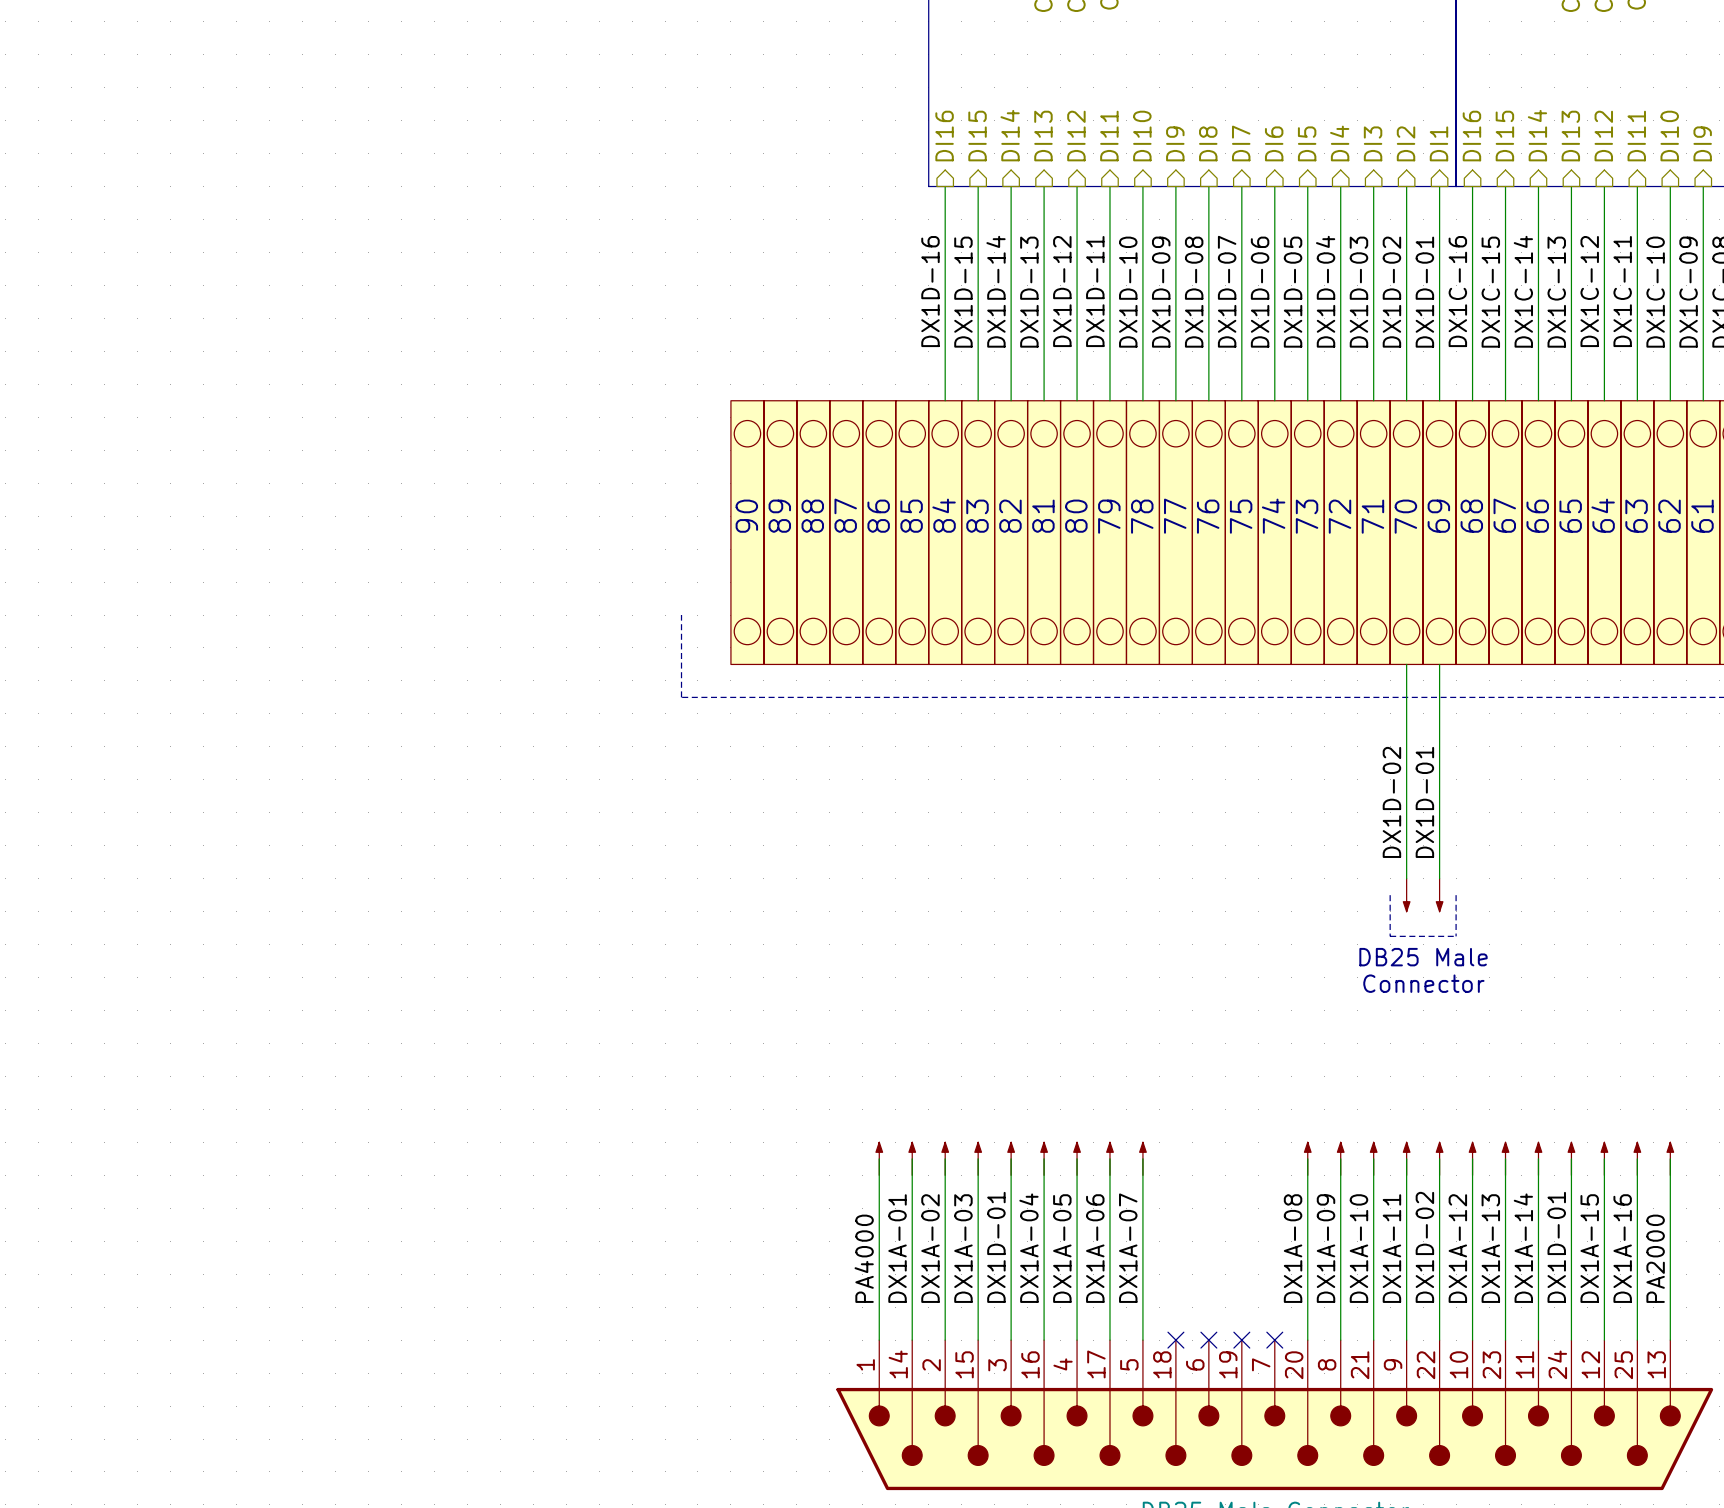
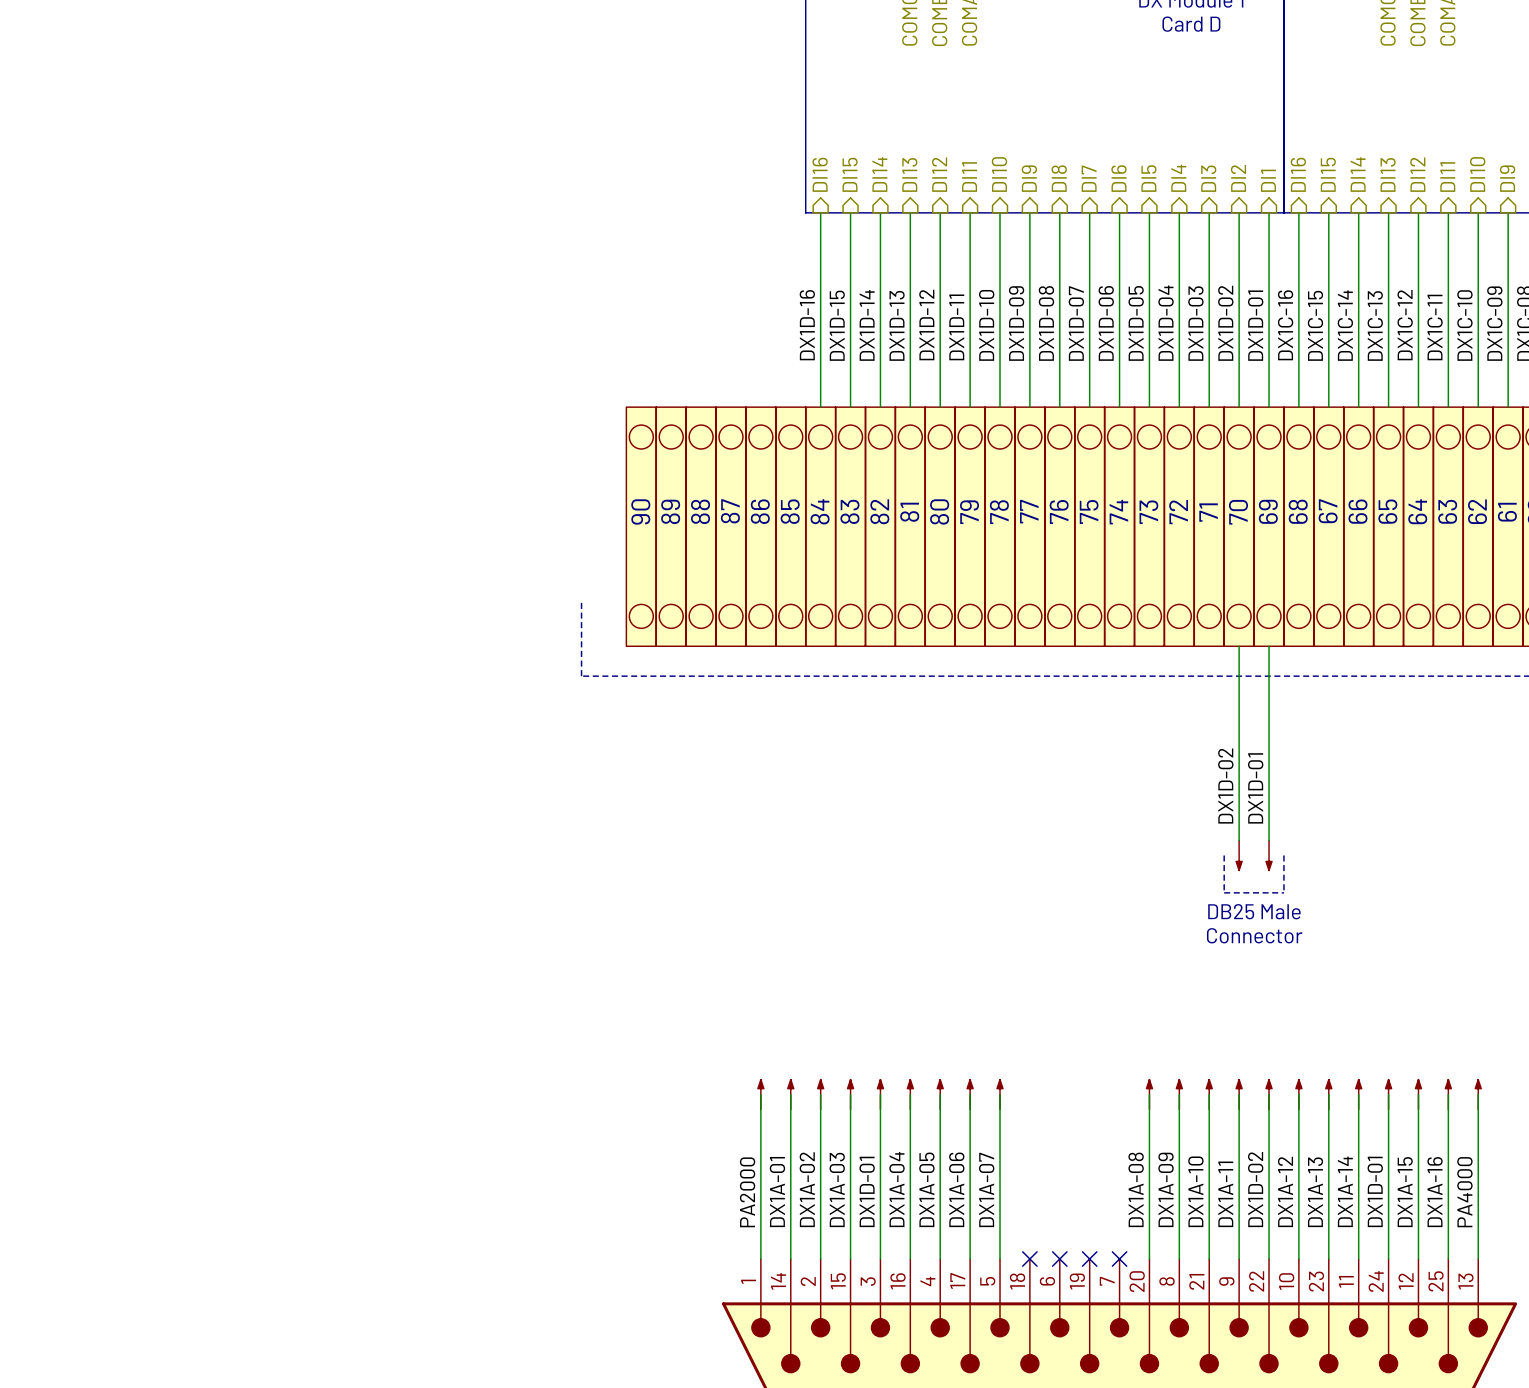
label: PA4000 (864, 1258) -> PA2000 (747, 1192)
label: PA2000 (1655, 1258) -> PA4000 (1464, 1192)

